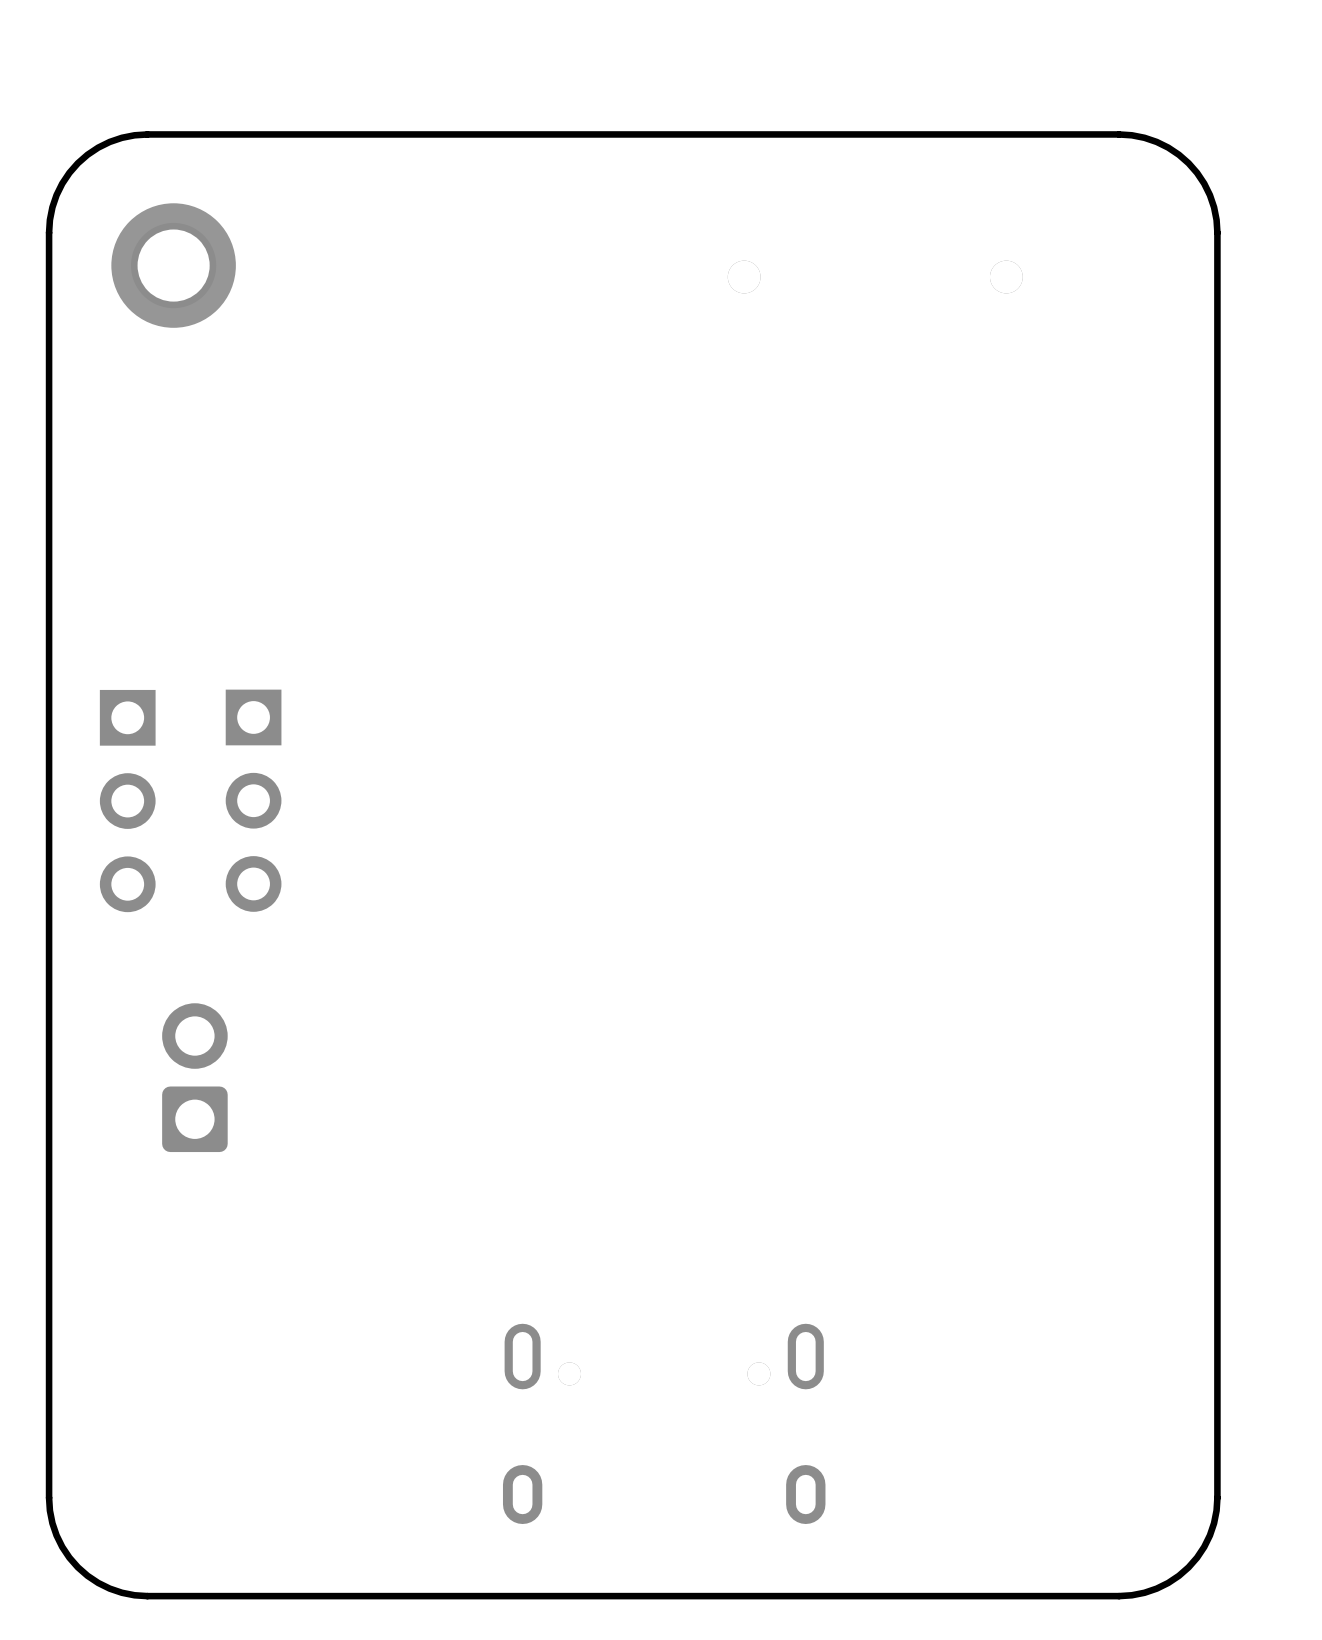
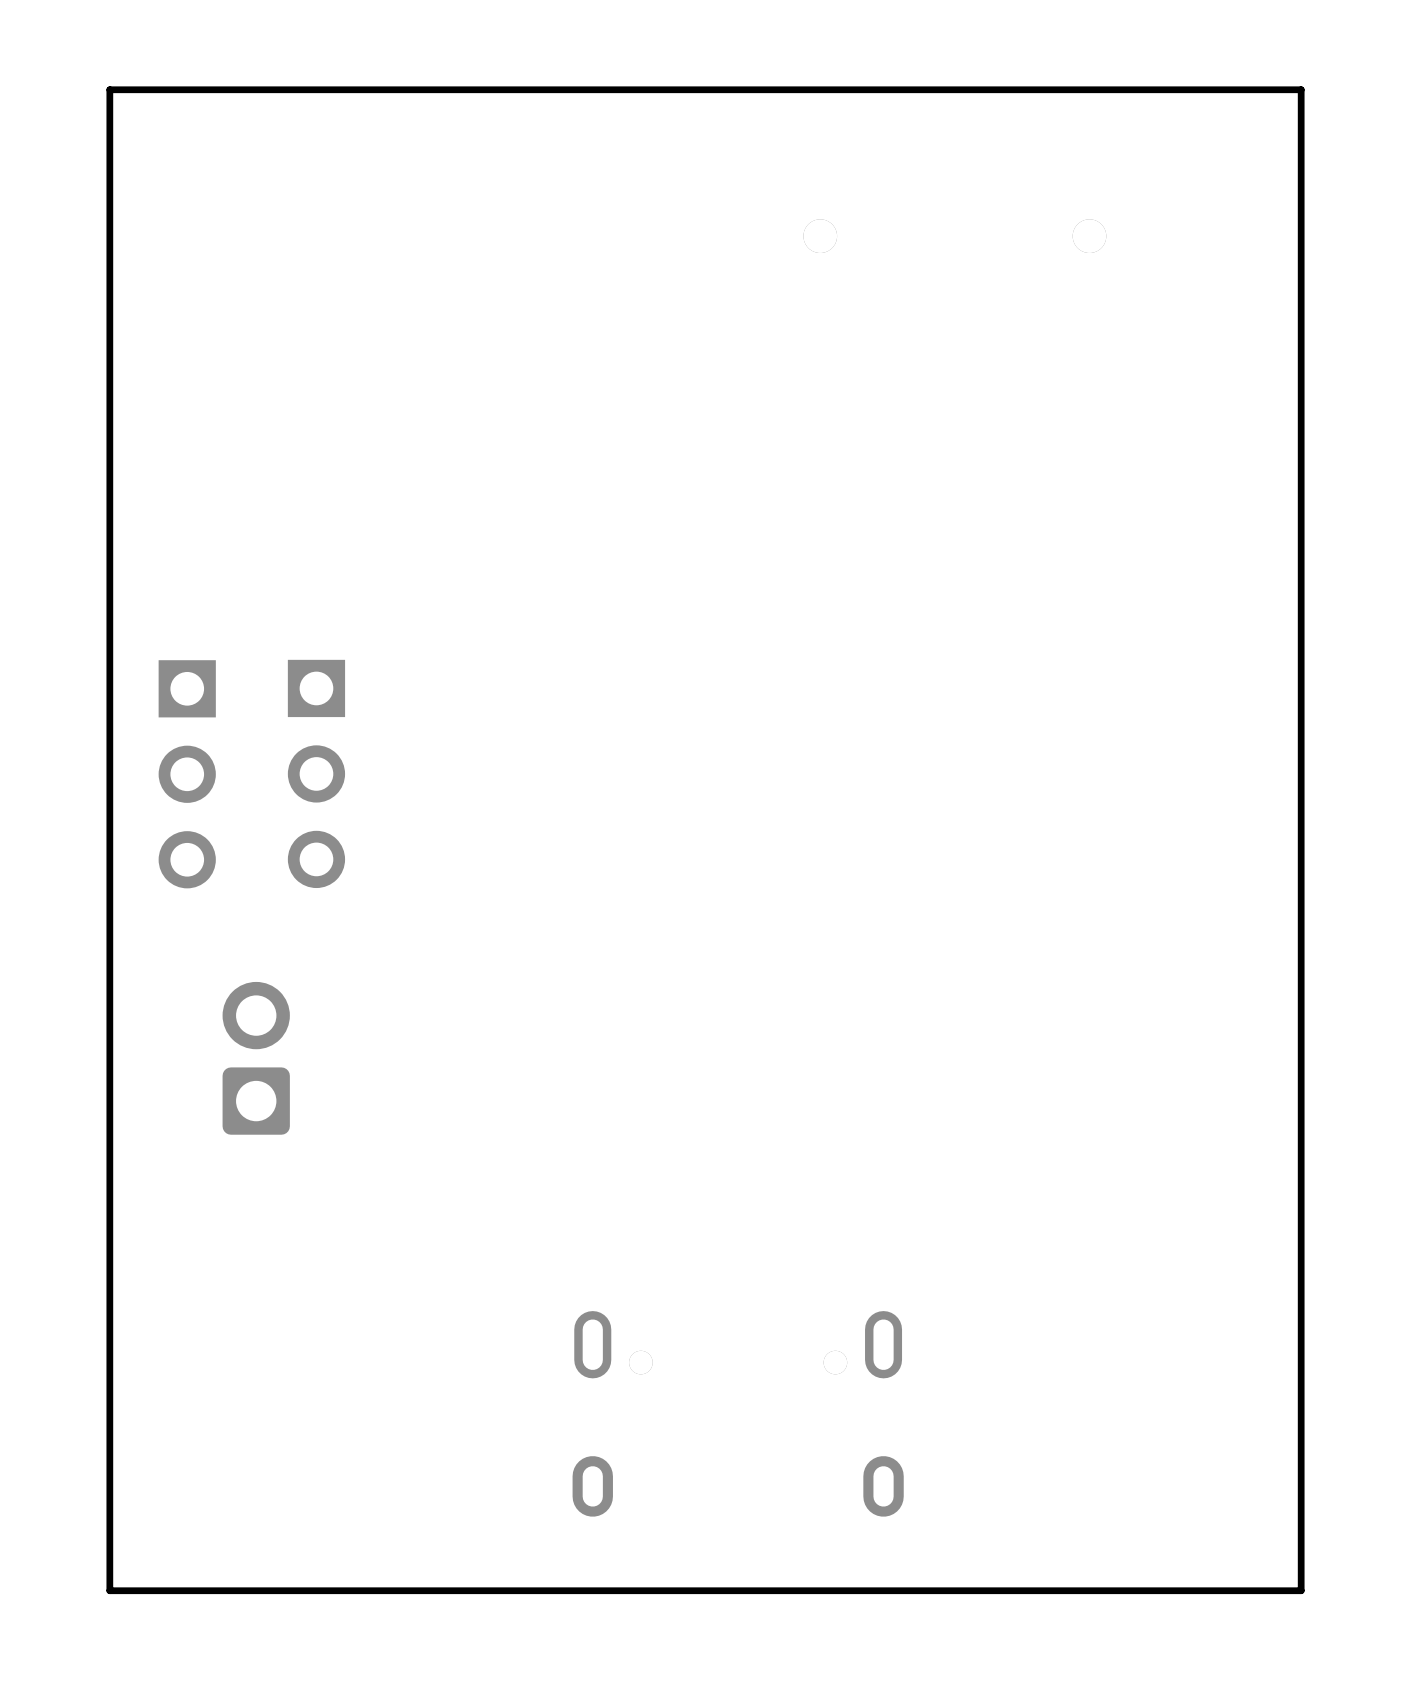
board edge: (147, 134) (134, 135) (109, 141) (87, 154) (77, 163) (62, 183) (56, 195) (49, 219) (49, 232) (49, 1510) (56, 1535) (62, 1546) (77, 1567) (87, 1575) (109, 1588) (121, 1592) (147, 1596) -> (207, 89) (109, 89) (109, 1590) (207, 1590)
board edge: (1119, 134) (1144, 137) (1156, 141) (1178, 154) (1188, 163) (1204, 183) (1209, 195) (1214, 207) (1217, 232) (1216, 1510) (1209, 1535) (1197, 1557) (1188, 1567) (1168, 1582) (1156, 1588) (1144, 1592) (1119, 1596) -> (1205, 89) (1301, 89) (1301, 1590) (1205, 1590)
part: (173, 265) -> none

